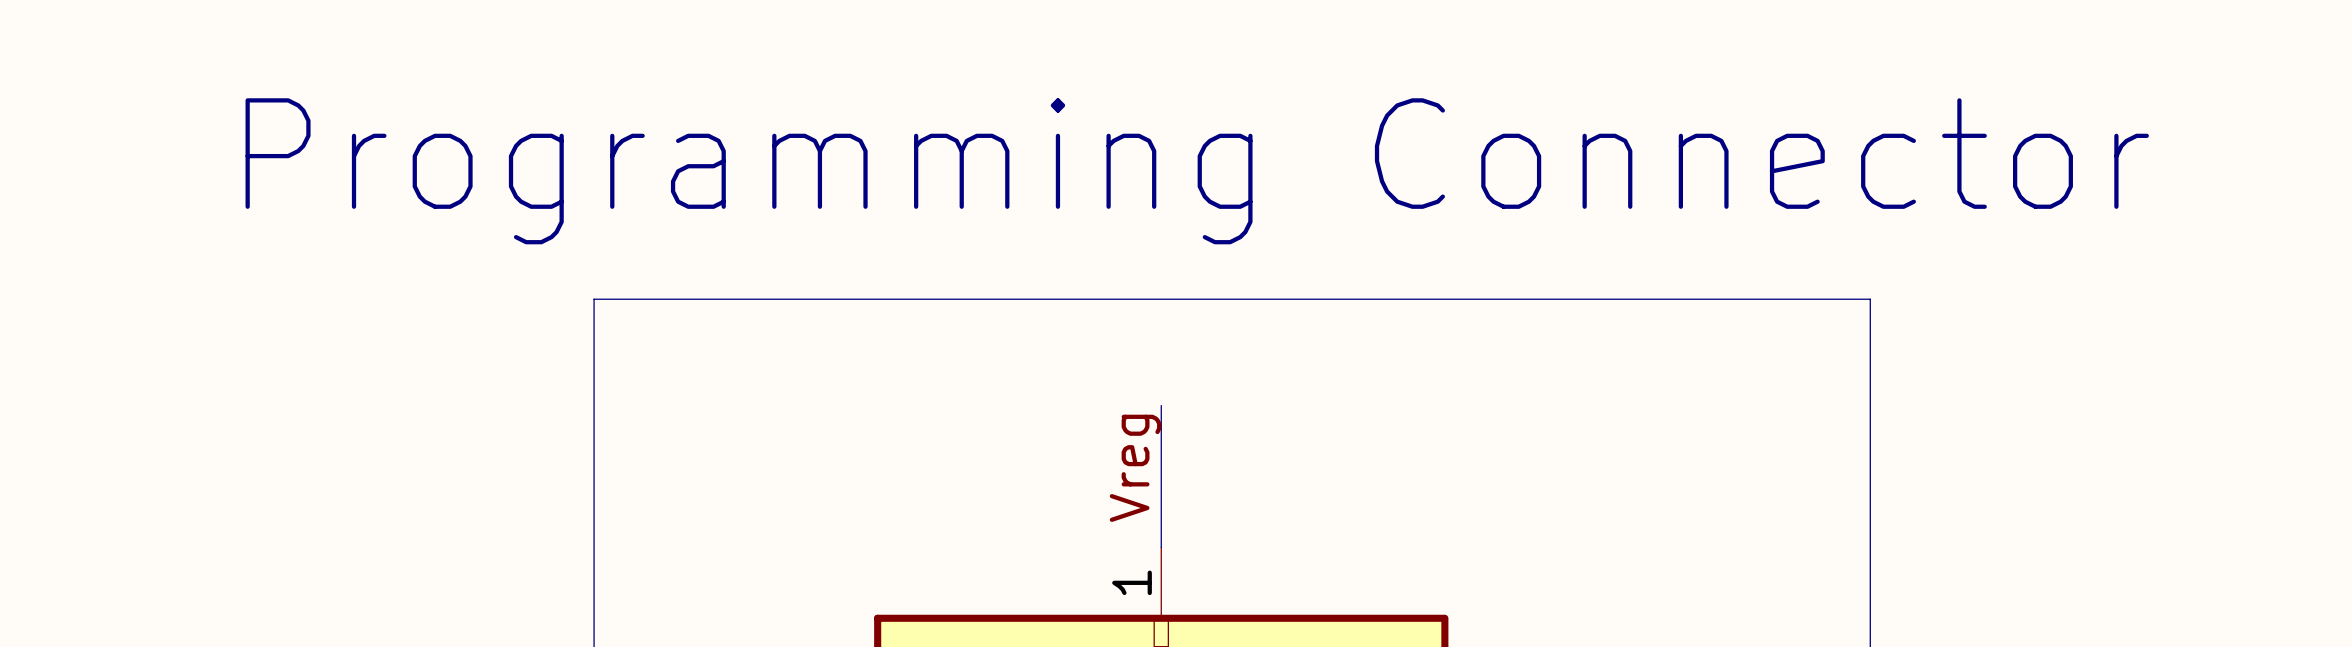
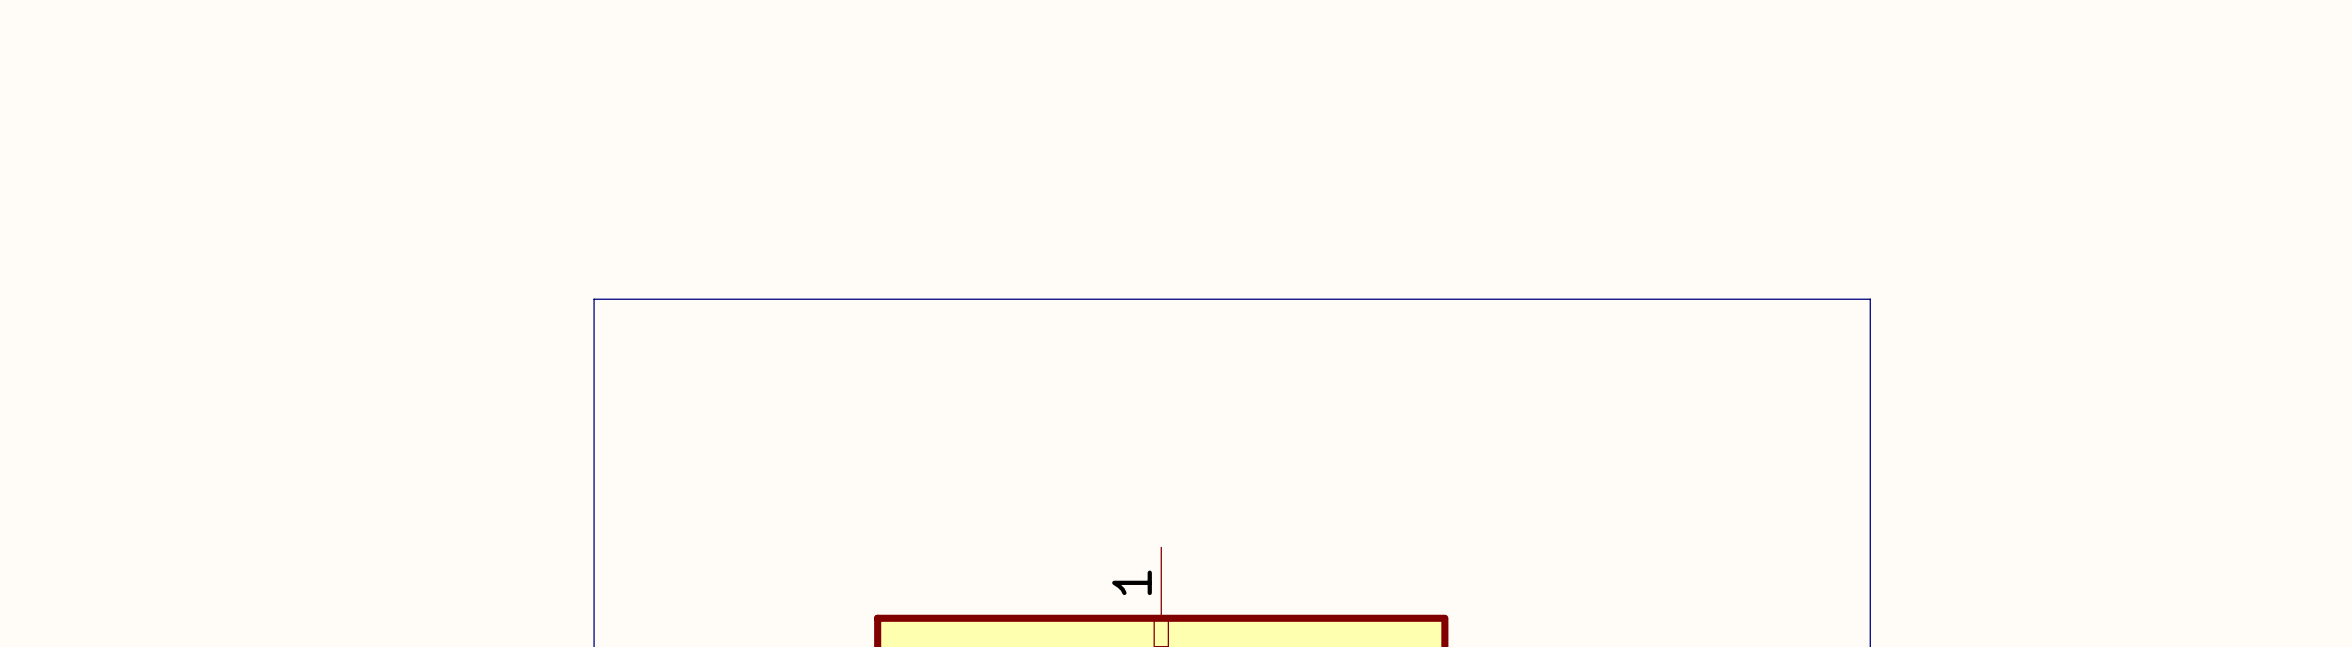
text: Programming Connector (1197, 171) -> none
wire: (1161, 405) (1161, 547) -> none
label: Vreg (1135, 468) -> none

